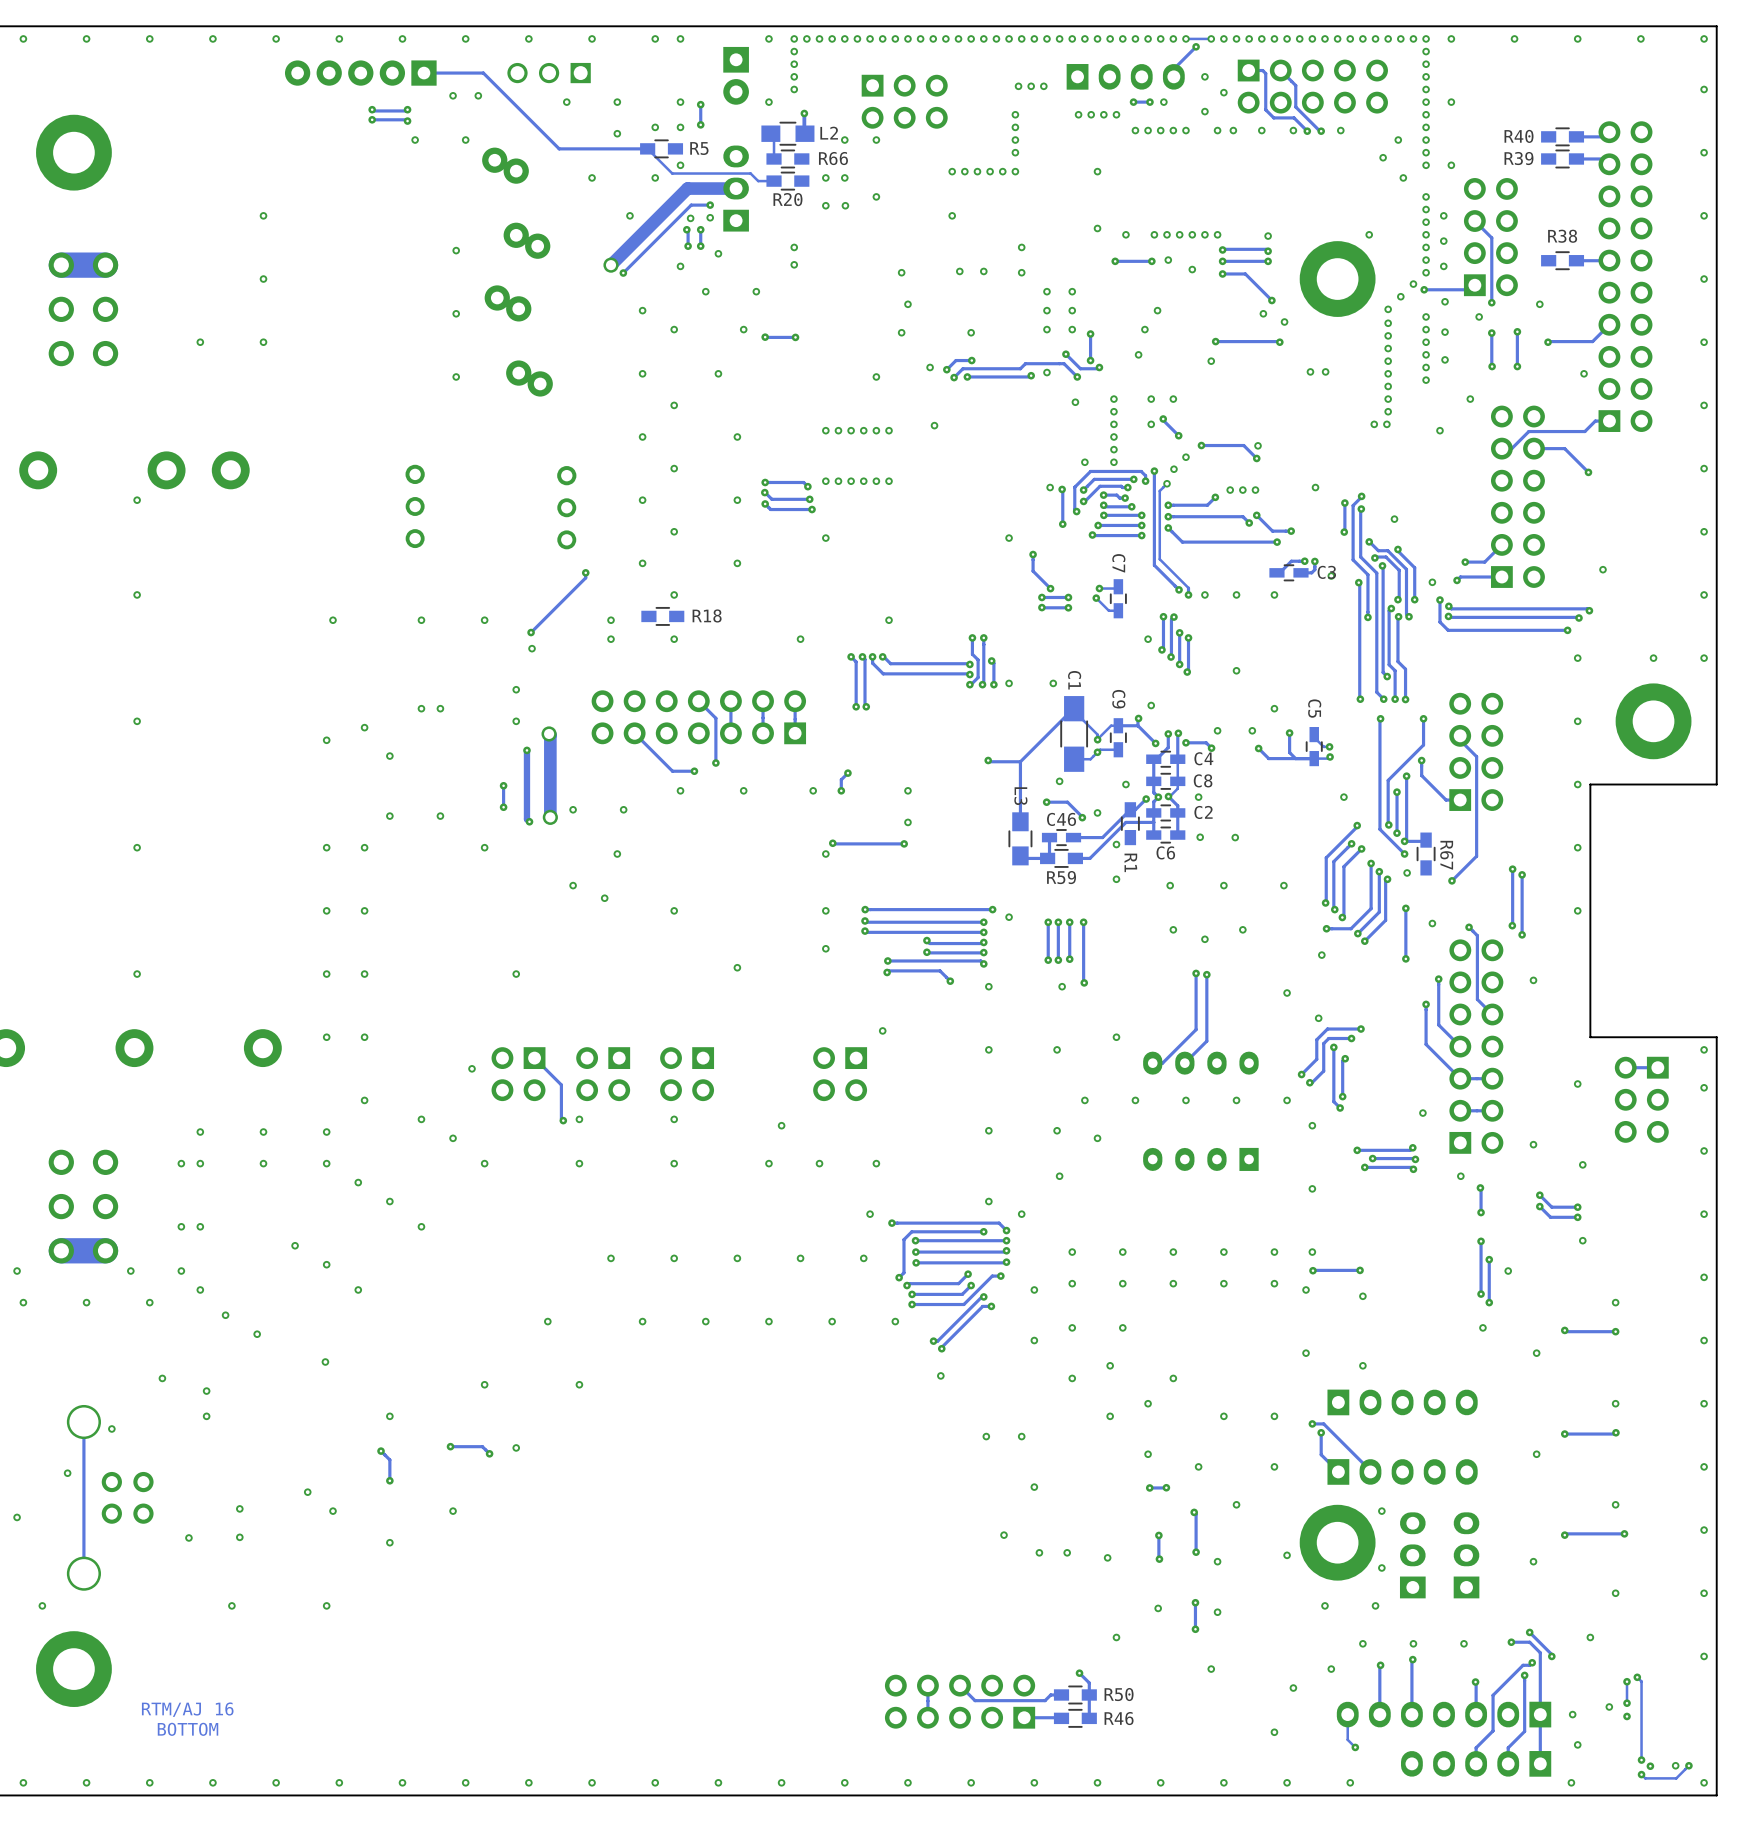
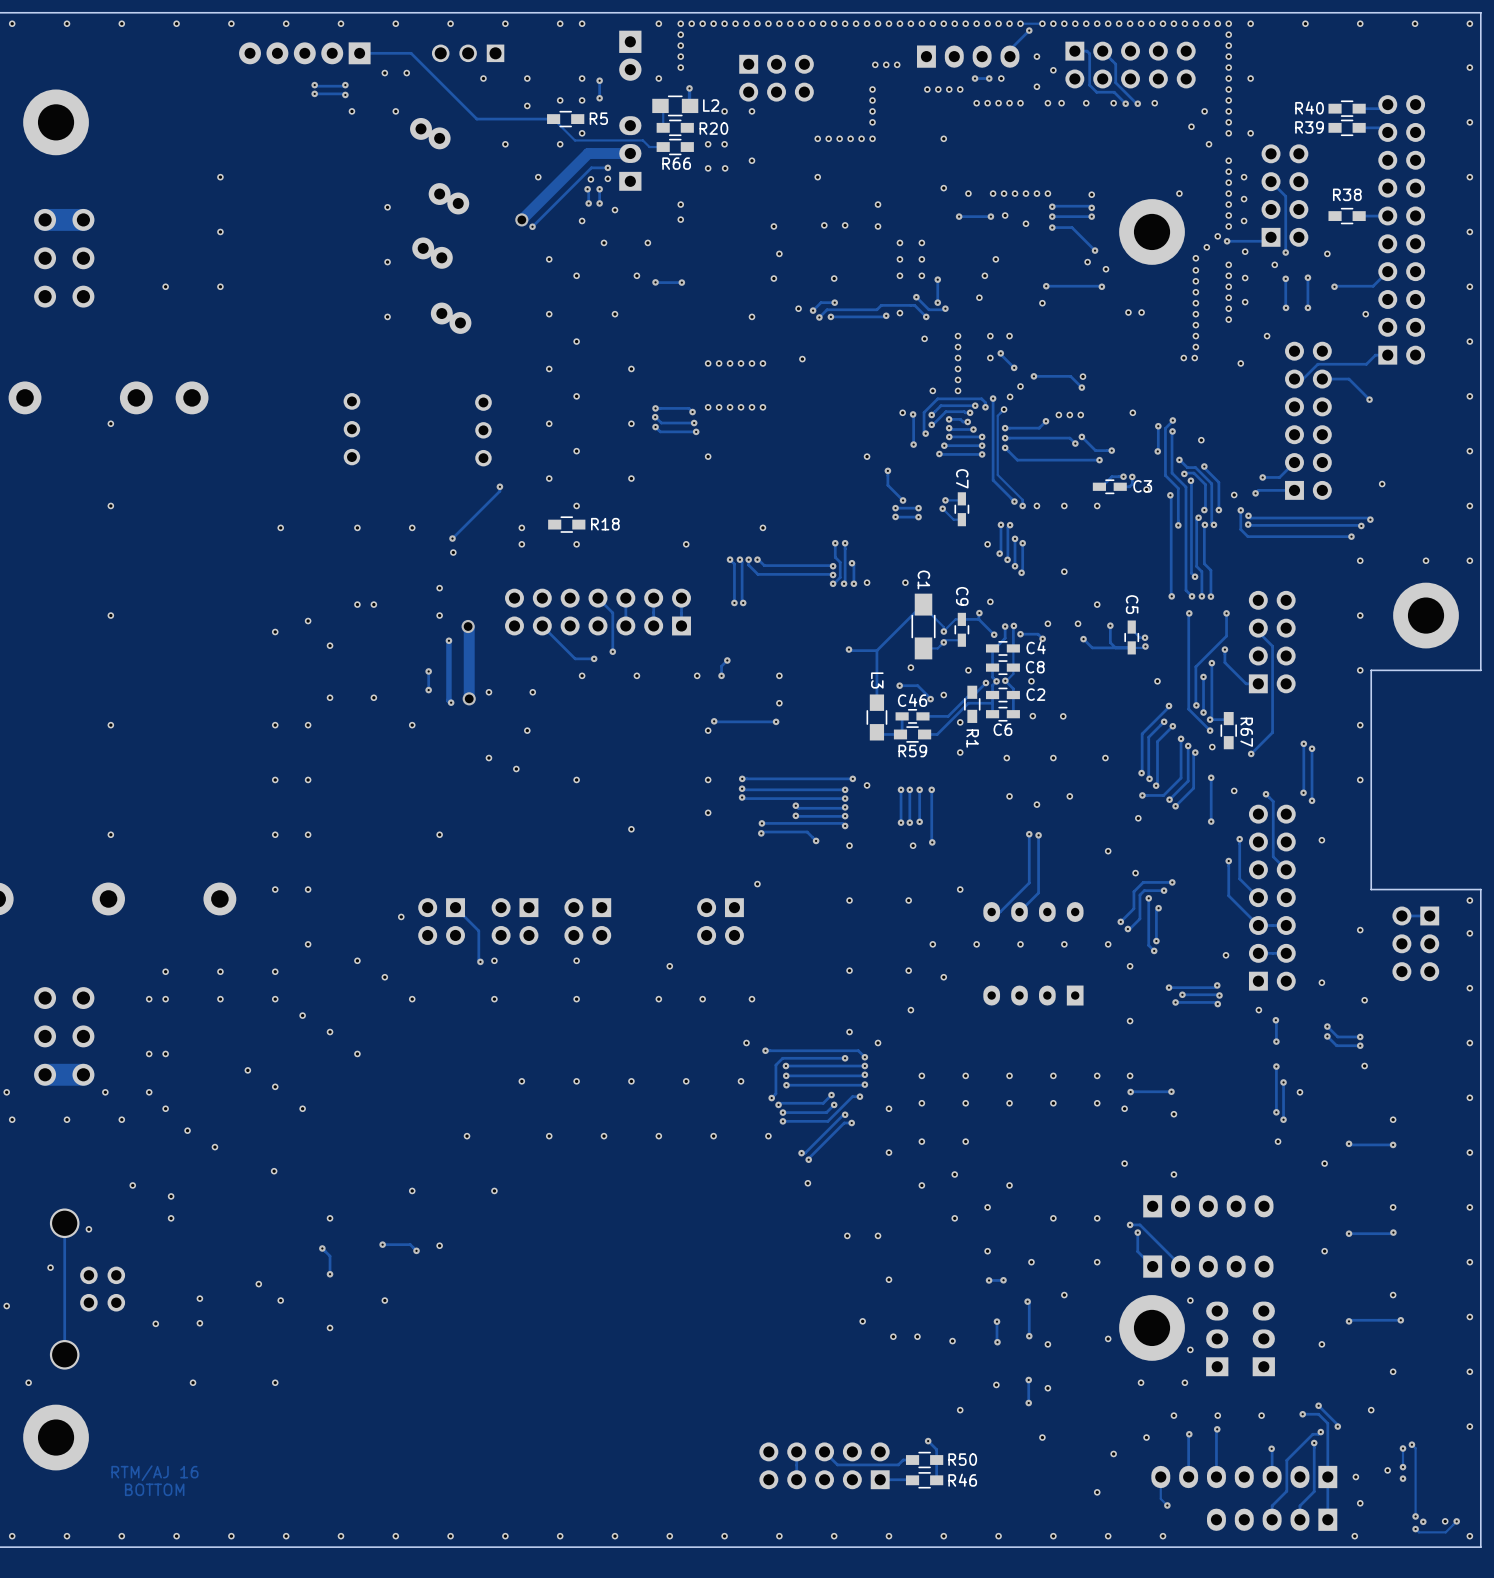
R66 name position: R66 (833, 158) -> R66 (676, 163)
R20 name position: R20 (787, 199) -> R20 (713, 128)

